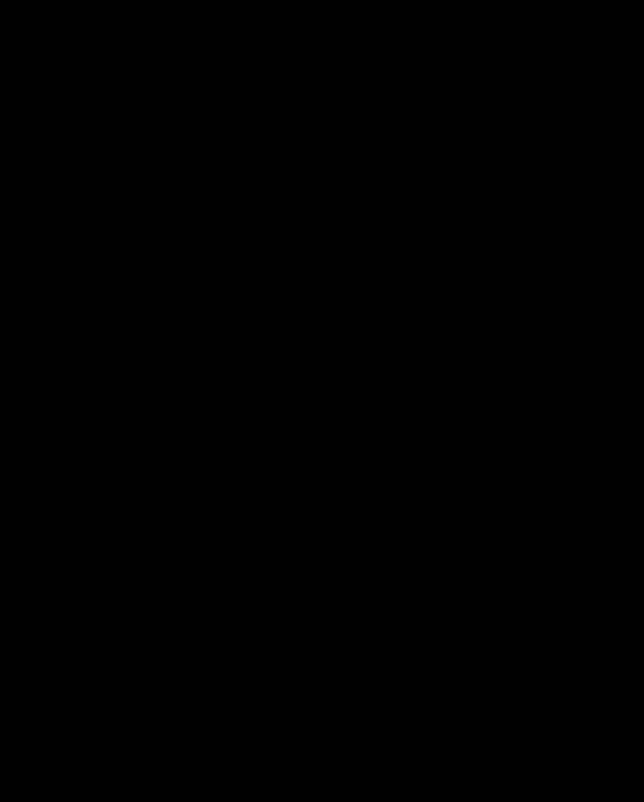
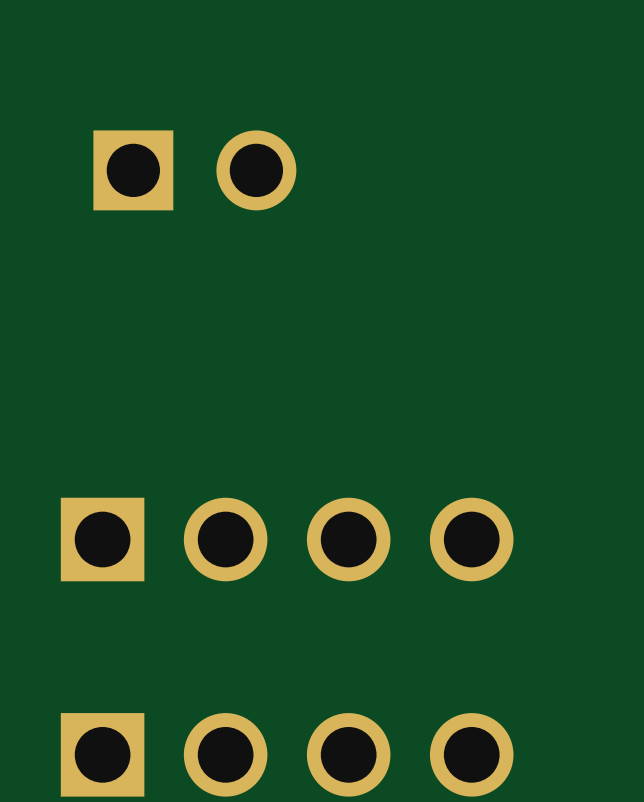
part: none -> (194, 170)
part: none -> (287, 539)
part: none -> (287, 754)

